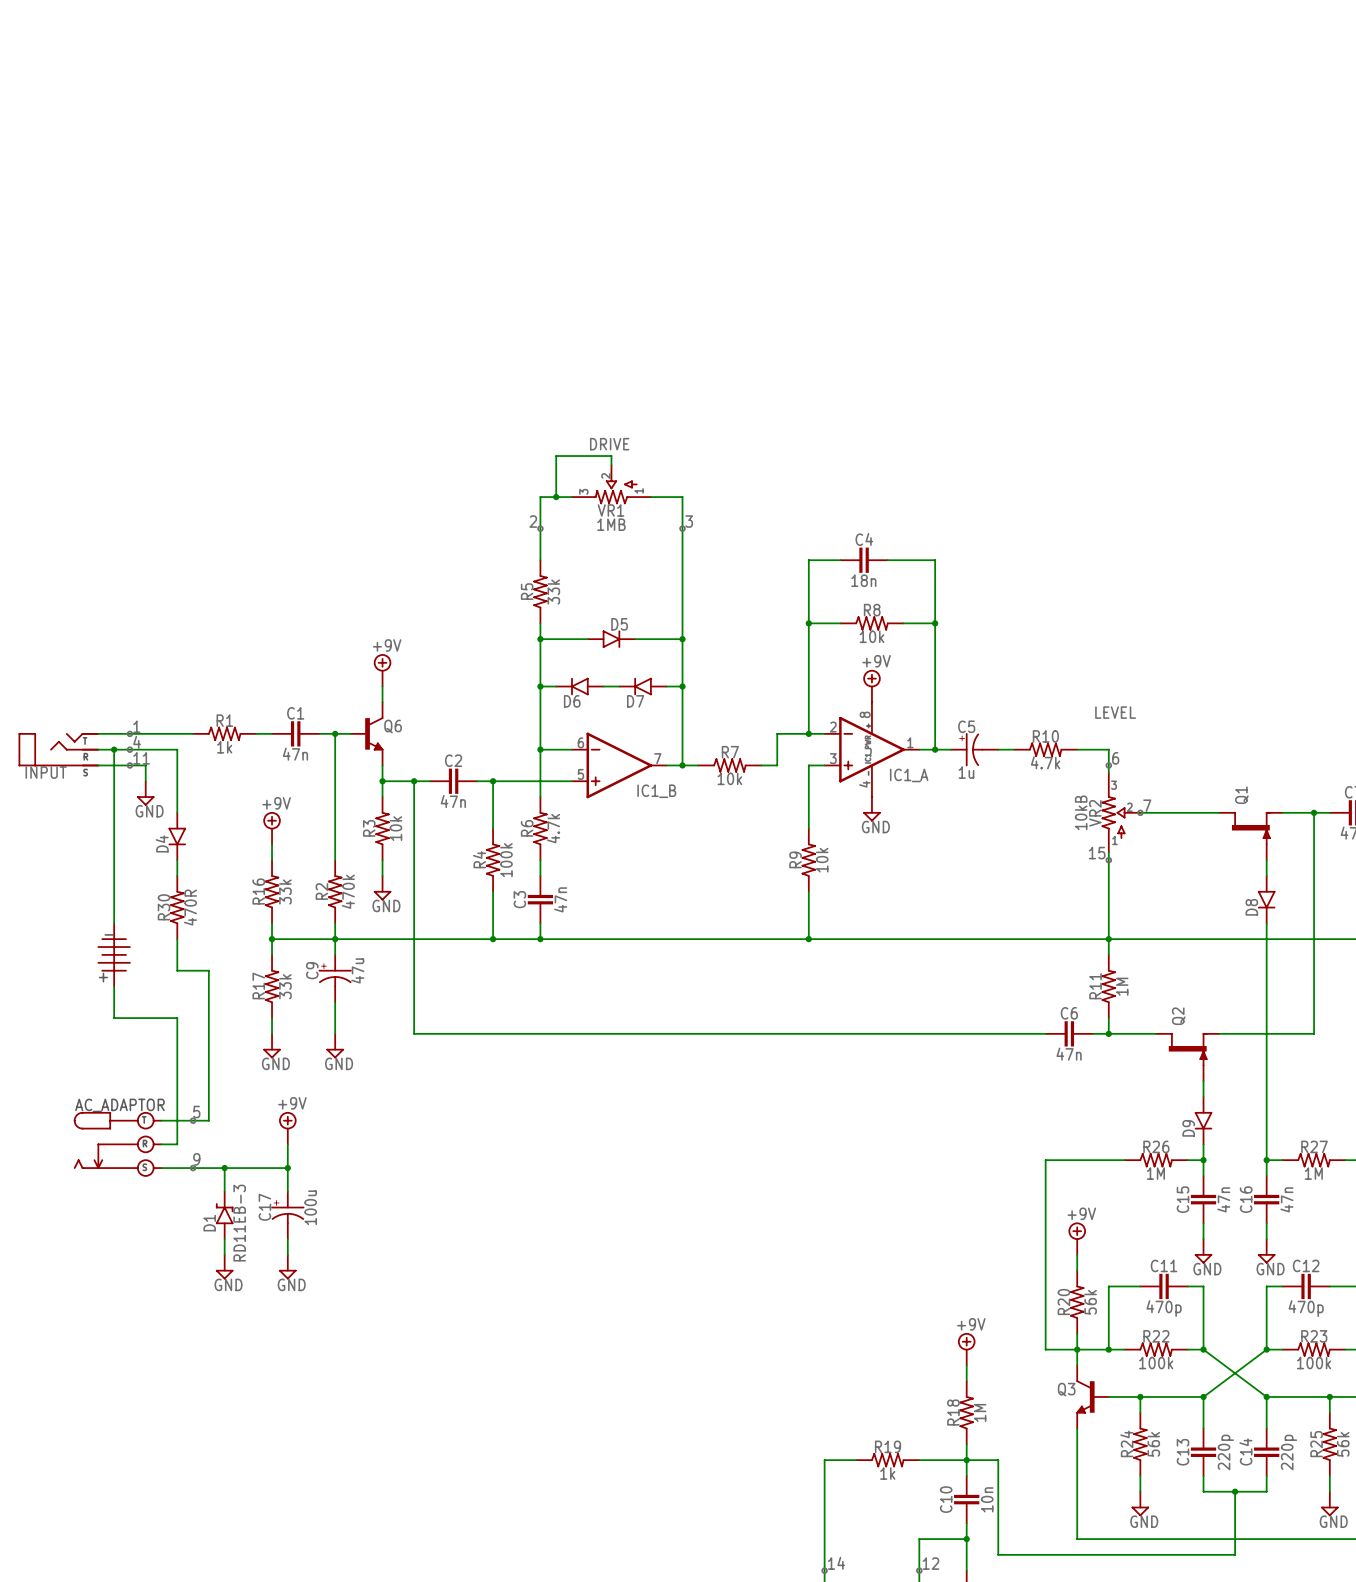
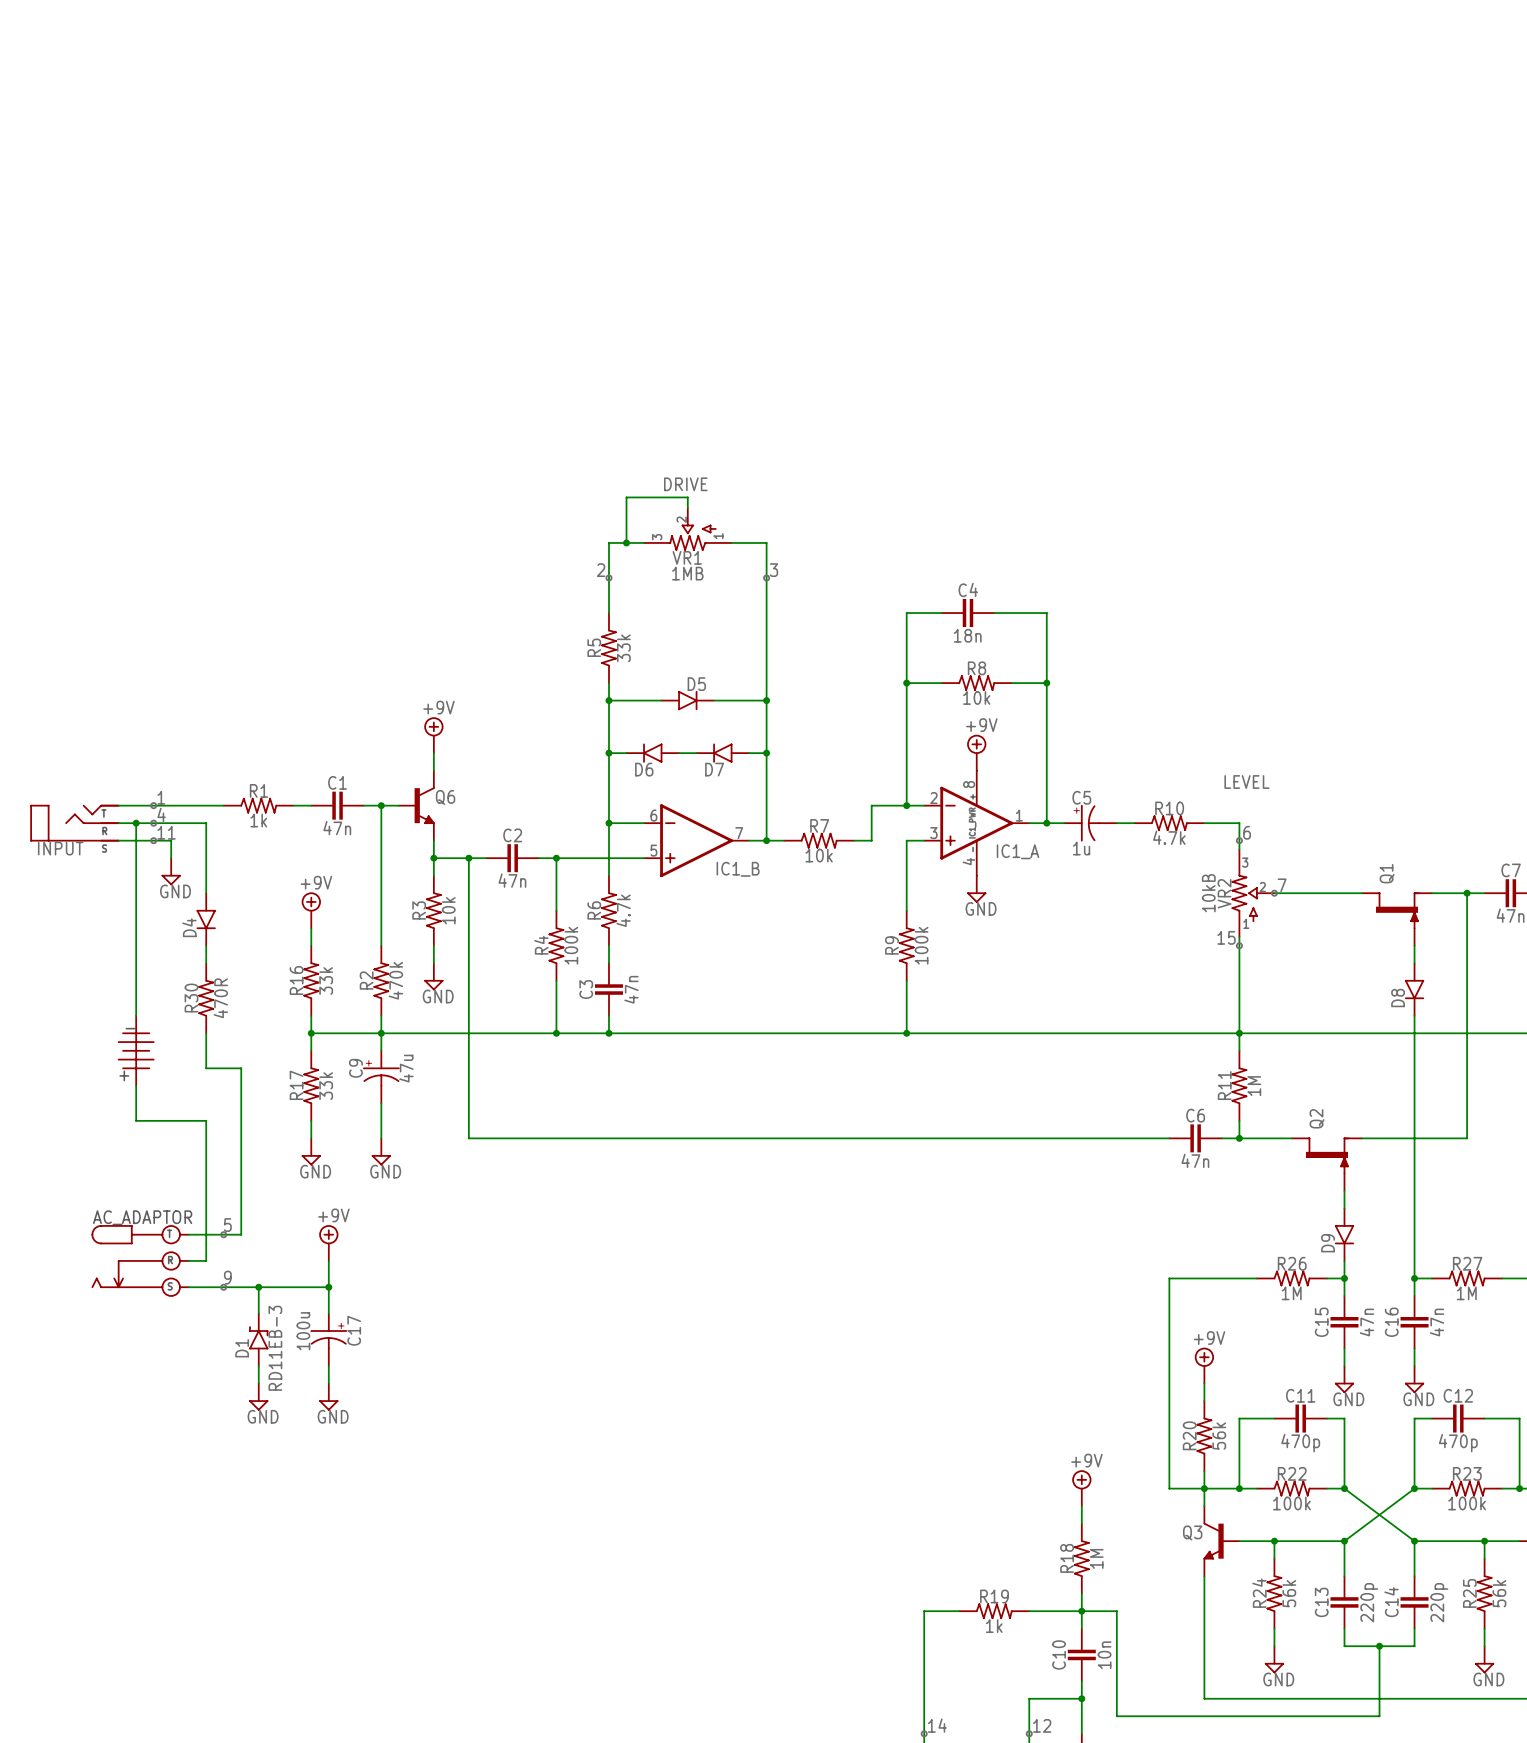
R9 value: 10k (822, 860) -> 100k (921, 945)
C17 flip: as is (287, 1212) -> left-right (328, 1335)

